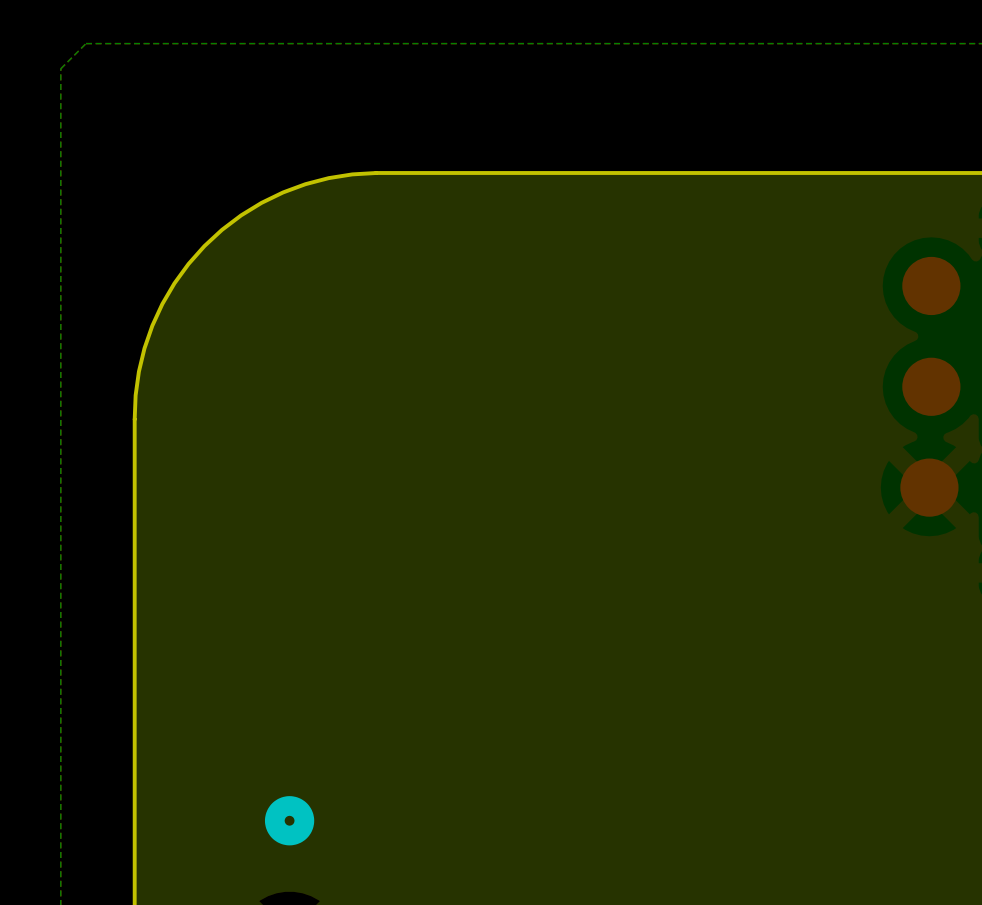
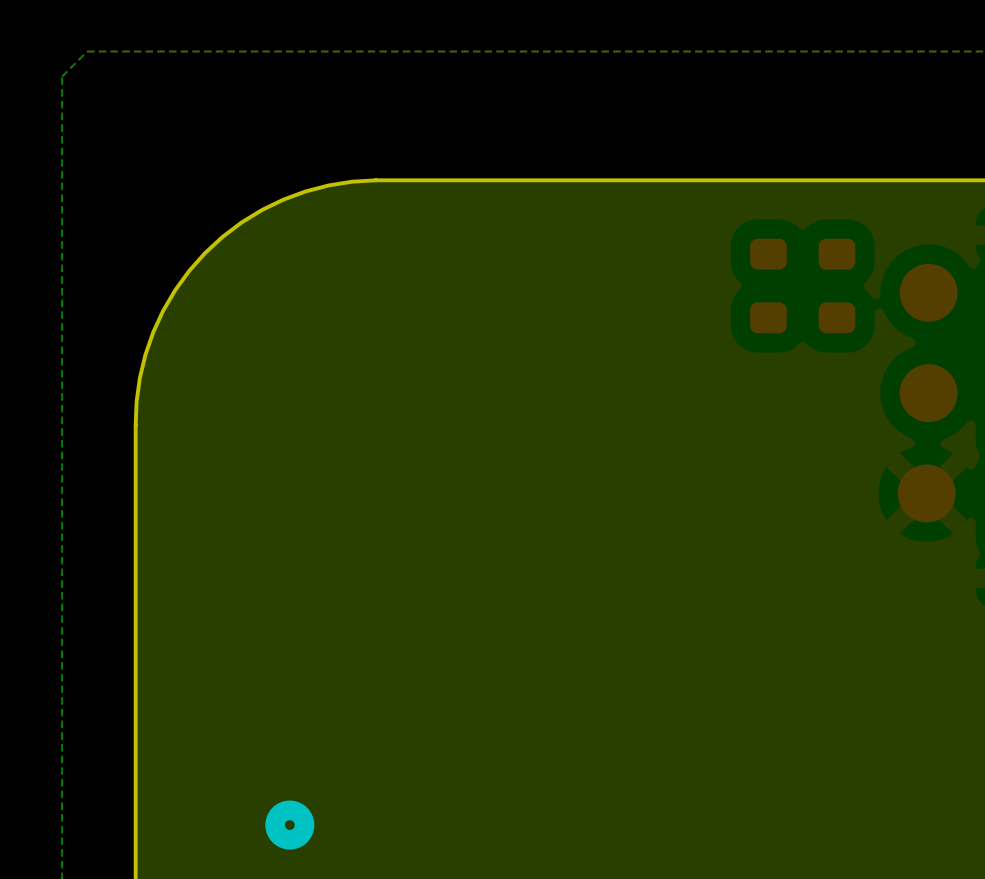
part: none -> (768, 285)
part: none -> (836, 285)

